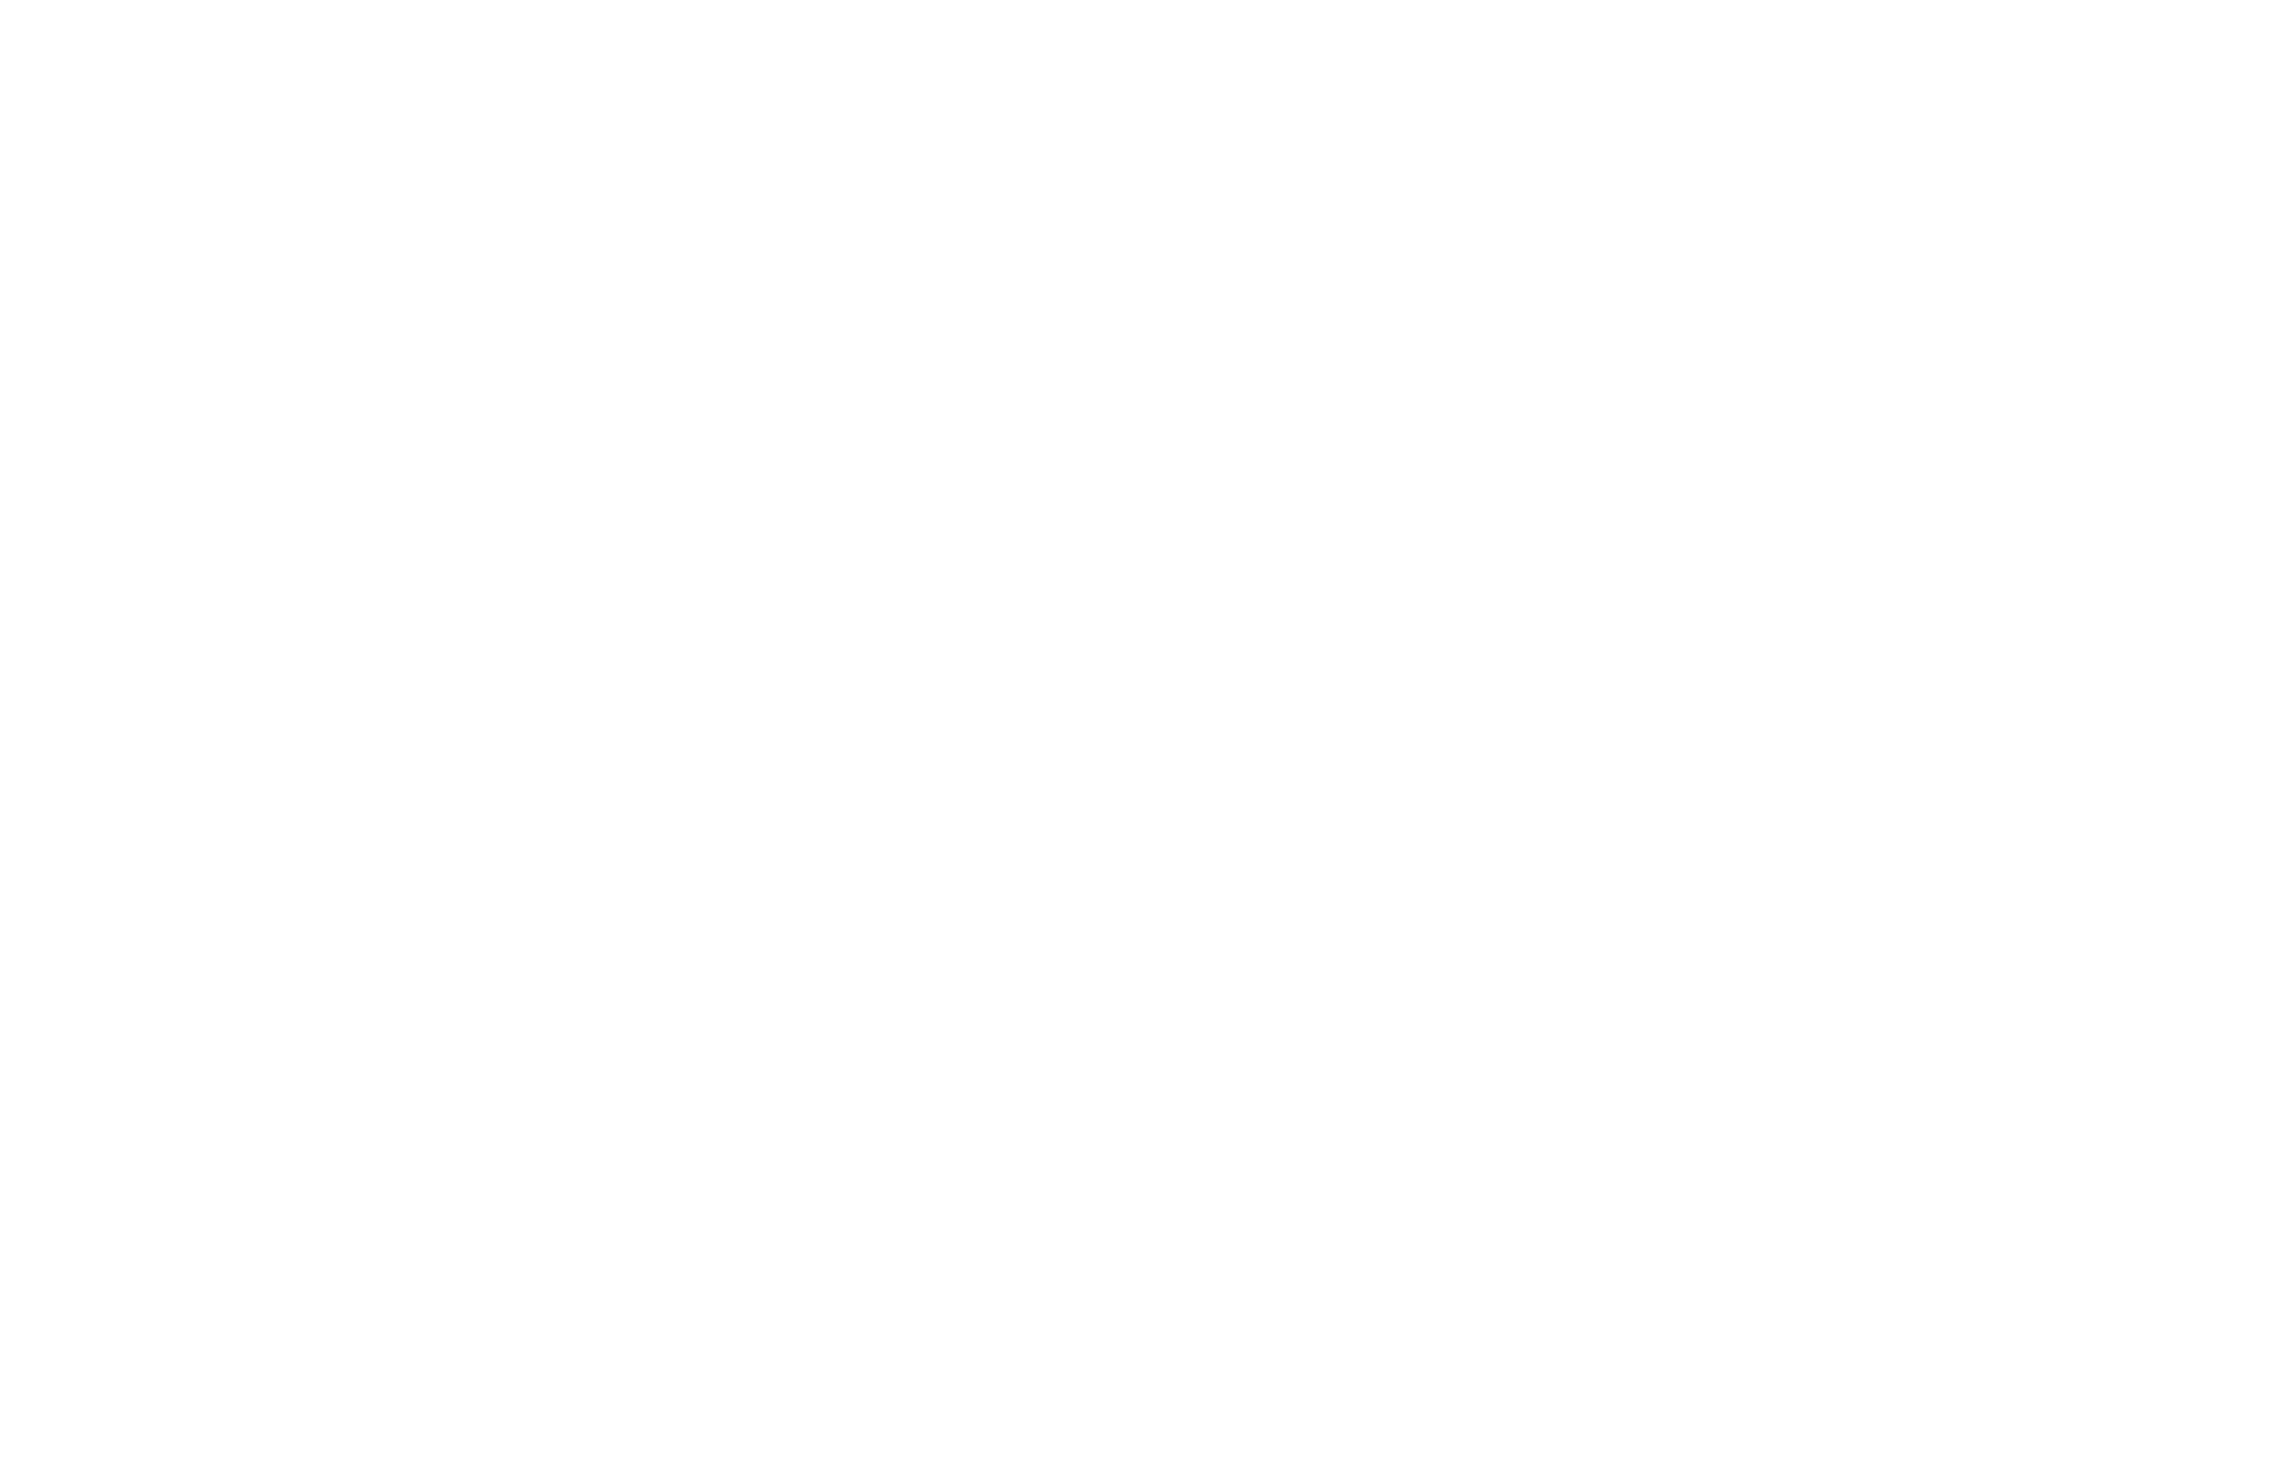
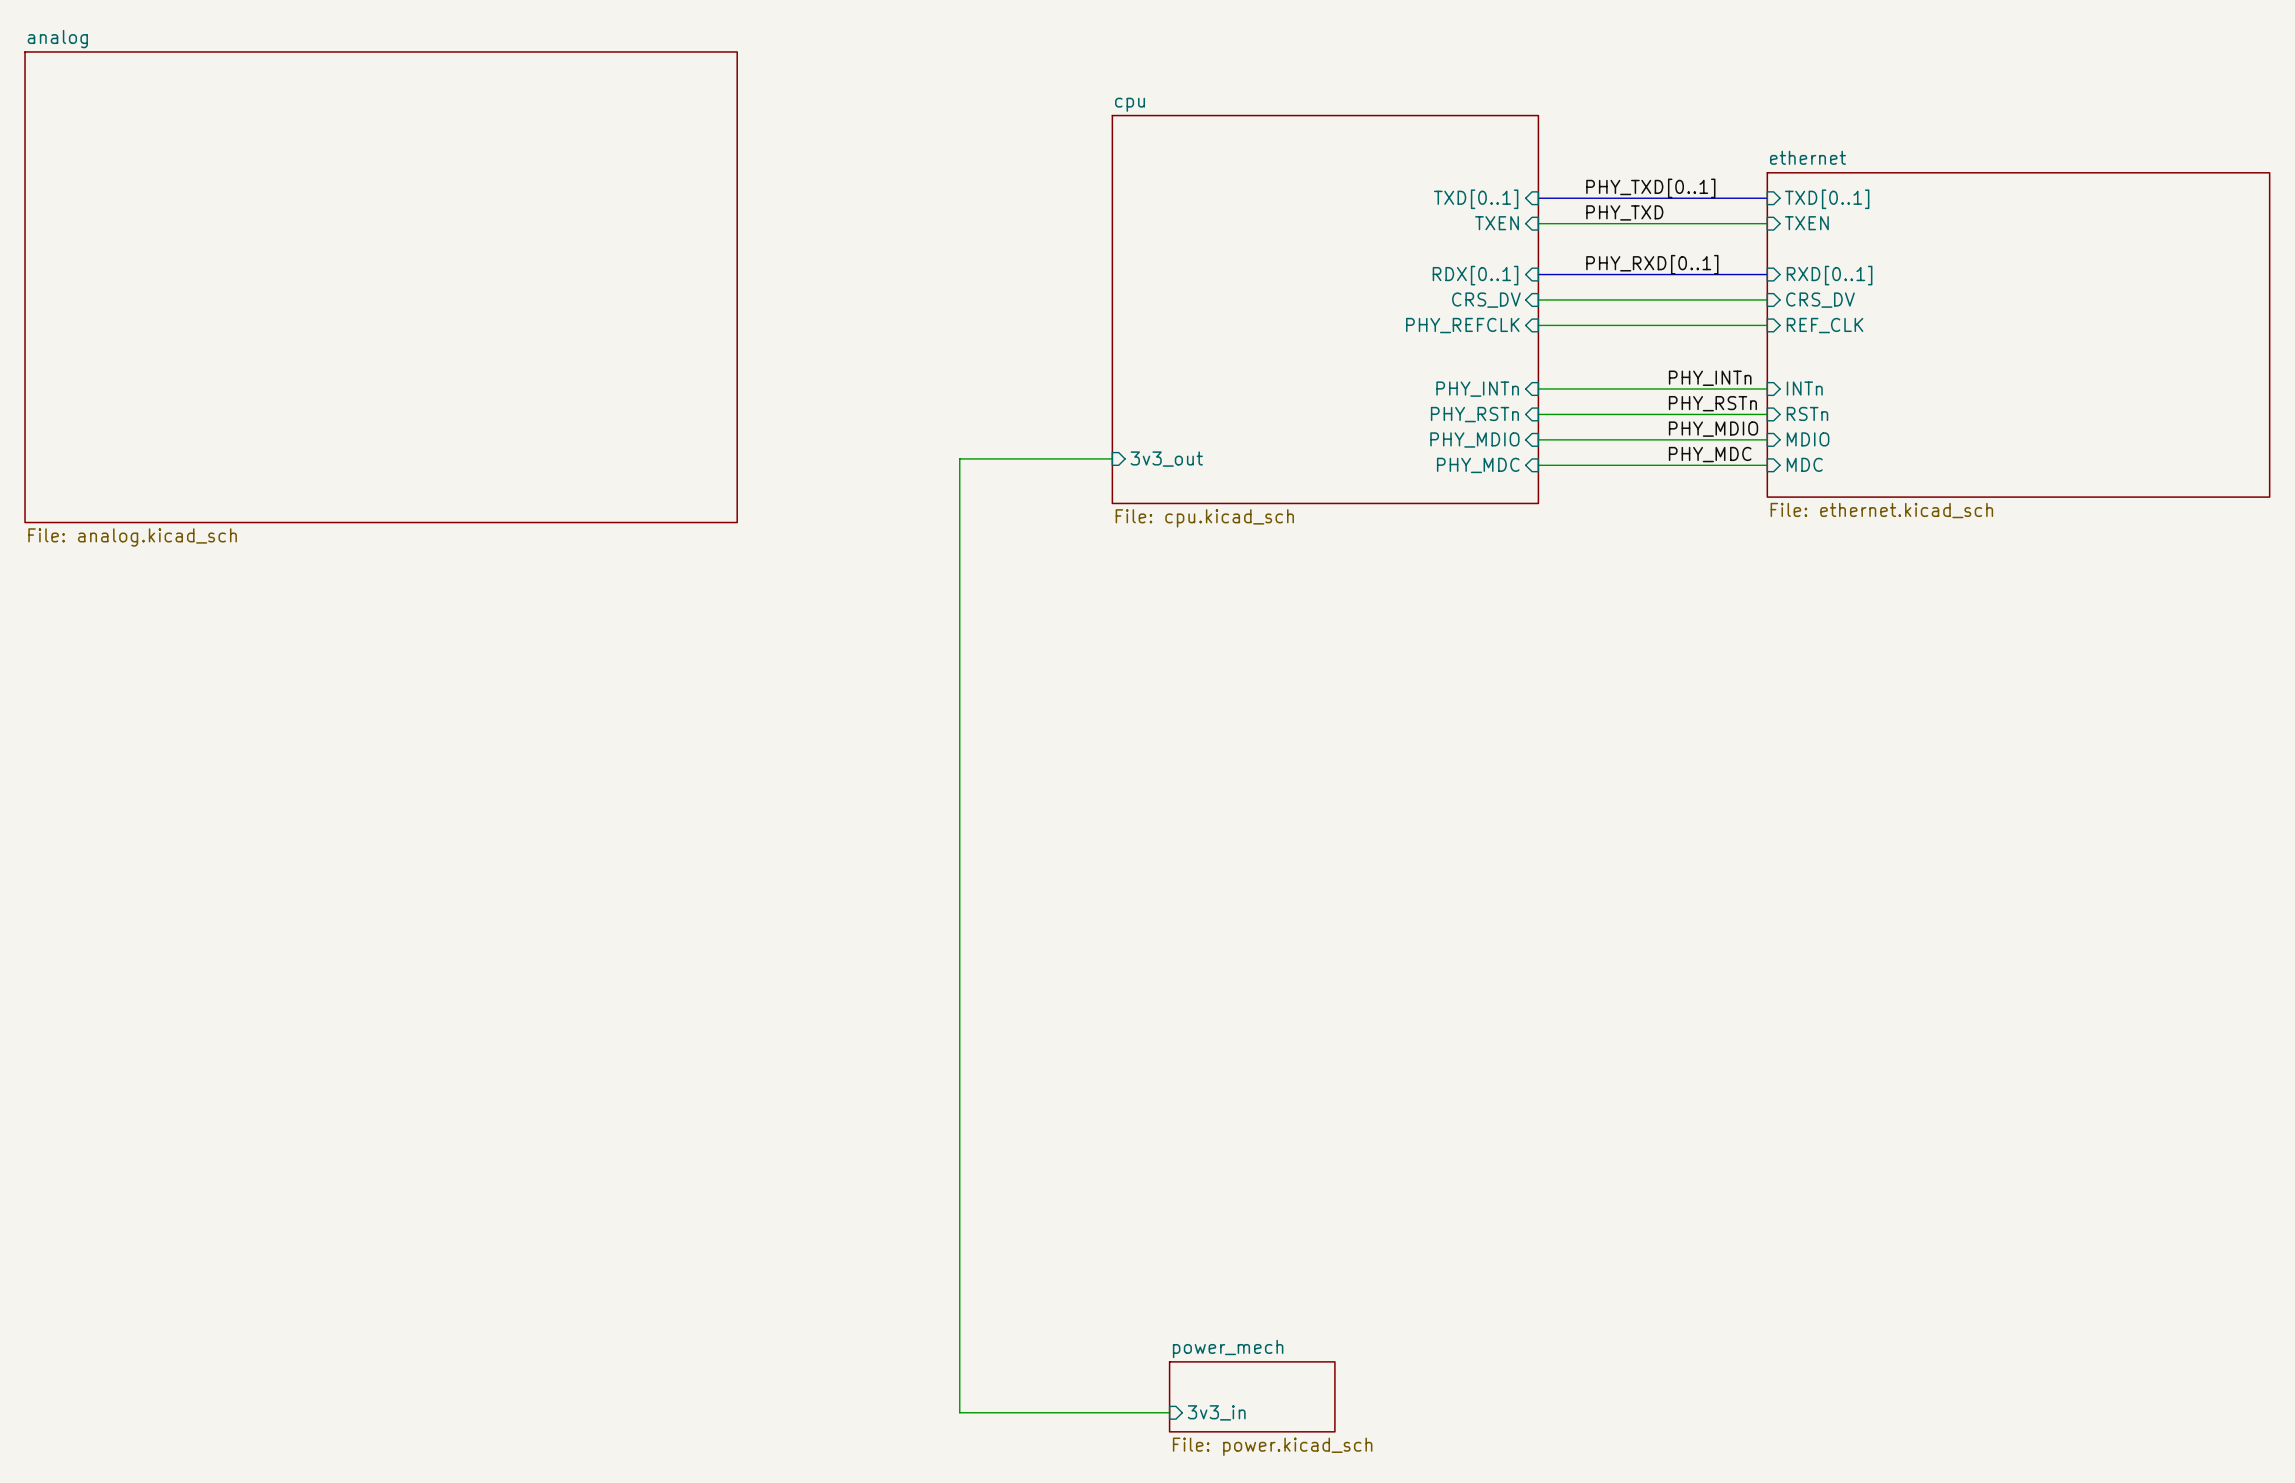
label: none -> PHY_TXD[0..1] (1650, 188)
bus: none -> (1538, 198) (1767, 198)
sheet pin: none -> TXD[0..1] (1476, 199)
sheet pin: none -> TXD[0..1] (1827, 199)
label: none -> PHY_TXD (1624, 212)
sheet pin: none -> TXEN (1497, 223)
wire: none -> (1538, 223) (1767, 223)
sheet pin: none -> TXEN (1806, 223)
label: none -> PHY_RXD[0..1] (1652, 264)
bus: none -> (1538, 274) (1767, 274)
sheet pin: none -> RDX[0..1] (1475, 275)
sheet pin: none -> RXD[0..1] (1829, 275)
sheet analog: none -> File: analog.kicad_sch (381, 287)
wire: none -> (1538, 299) (1767, 299)
sheet pin: none -> CRS_DV (1486, 300)
sheet pin: none -> CRS_DV (1820, 300)
sheet cpu: none -> File: cpu.kicad_sch (1325, 309)
sheet pin: none -> PHY_REFCLK (1462, 325)
wire: none -> (1538, 325) (1767, 325)
sheet pin: none -> REF_CLK (1825, 325)
sheet ethernet: none -> File: ethernet.kicad_sch (2018, 334)
label: none -> PHY_INTn (1710, 378)
sheet pin: none -> INTn (1804, 388)
sheet pin: none -> PHY_INTn (1477, 389)
wire: none -> (1538, 389) (1767, 389)
label: none -> PHY_RSTn (1712, 403)
sheet pin: none -> RSTn (1807, 413)
sheet pin: none -> PHY_RSTn (1474, 414)
wire: none -> (1538, 414) (1767, 414)
label: none -> PHY_MDIO (1713, 429)
wire: none -> (1538, 439) (1767, 439)
sheet pin: none -> MDIO (1808, 439)
sheet pin: none -> PHY_MDIO (1474, 440)
label: none -> PHY_MDC (1710, 454)
wire: none -> (1112, 458) (959, 458) (959, 1412) (1169, 1412)
sheet pin: none -> 3v3_out (1166, 459)
sheet pin: none -> MDC (1804, 464)
sheet pin: none -> PHY_MDC (1478, 465)
wire: none -> (1538, 465) (1767, 465)
sheet power_mech: none -> File: power.kicad_sch (1252, 1396)
sheet pin: none -> 3v3_in (1216, 1412)

